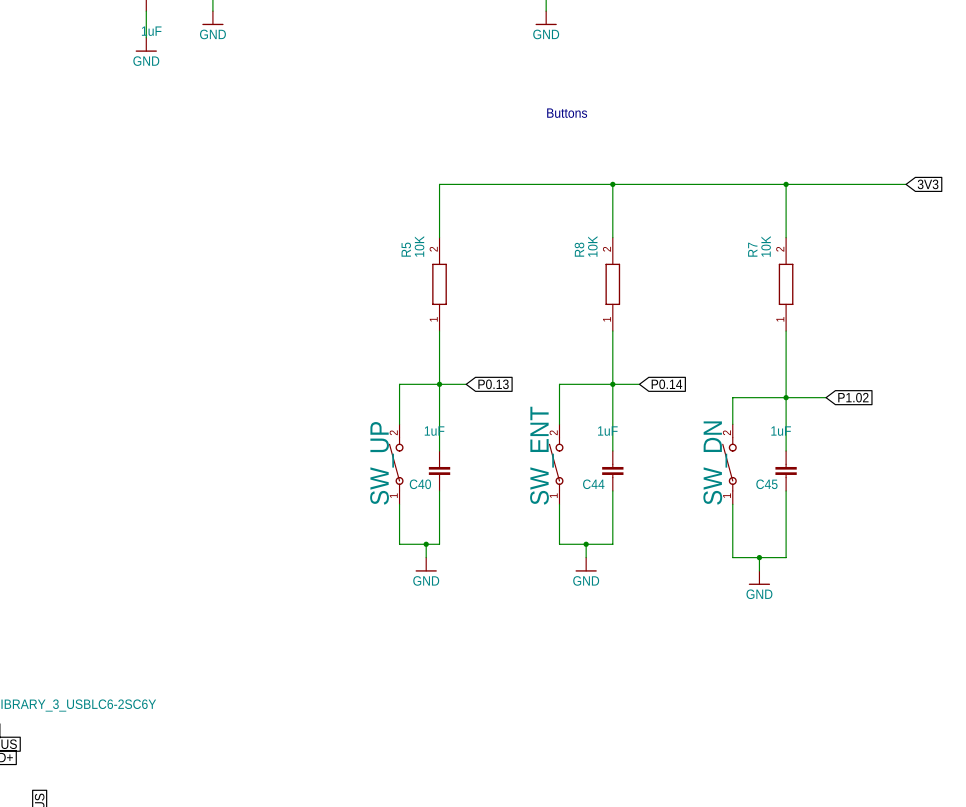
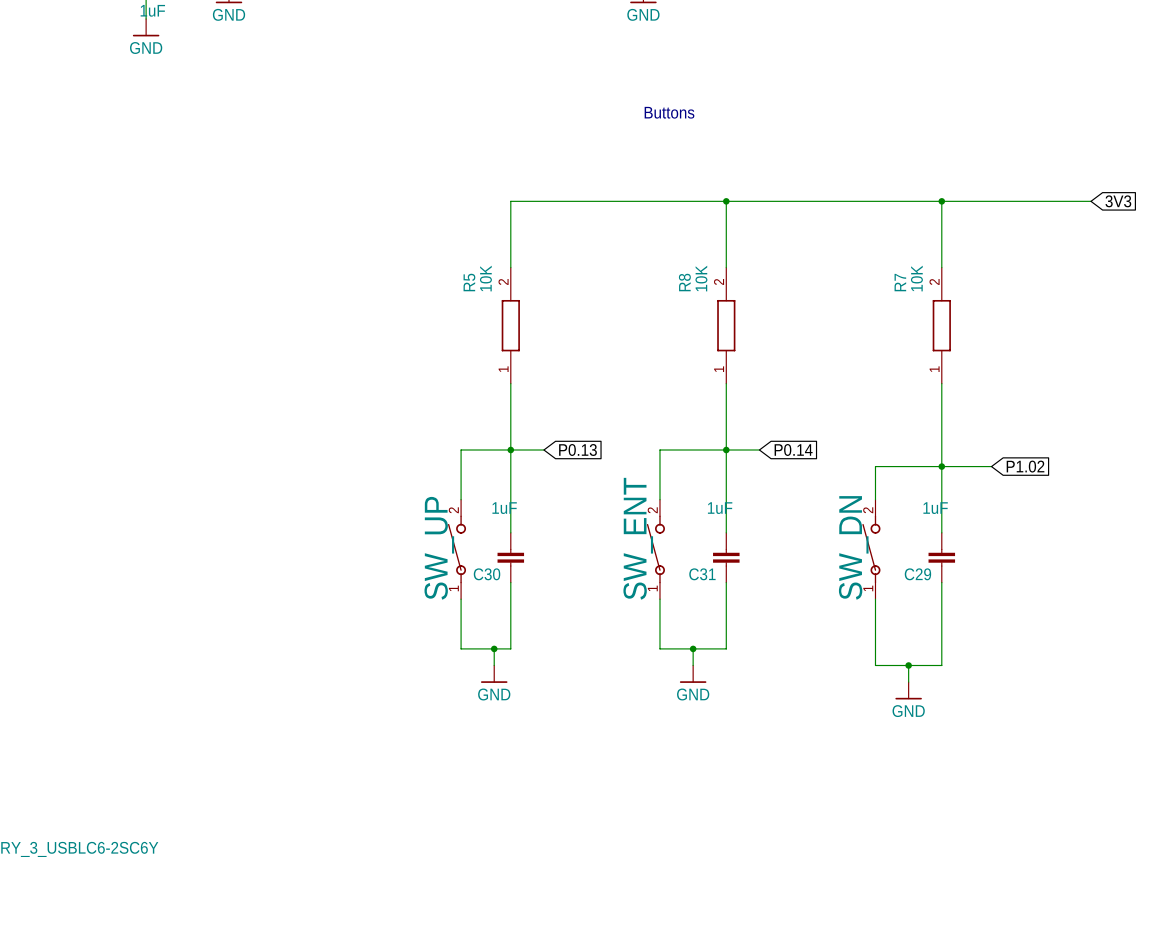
C40 name: C40 (420, 484) -> C30 (487, 574)
C44 name: C44 (593, 484) -> C31 (702, 574)
C45 name: C45 (766, 484) -> C29 (917, 574)

